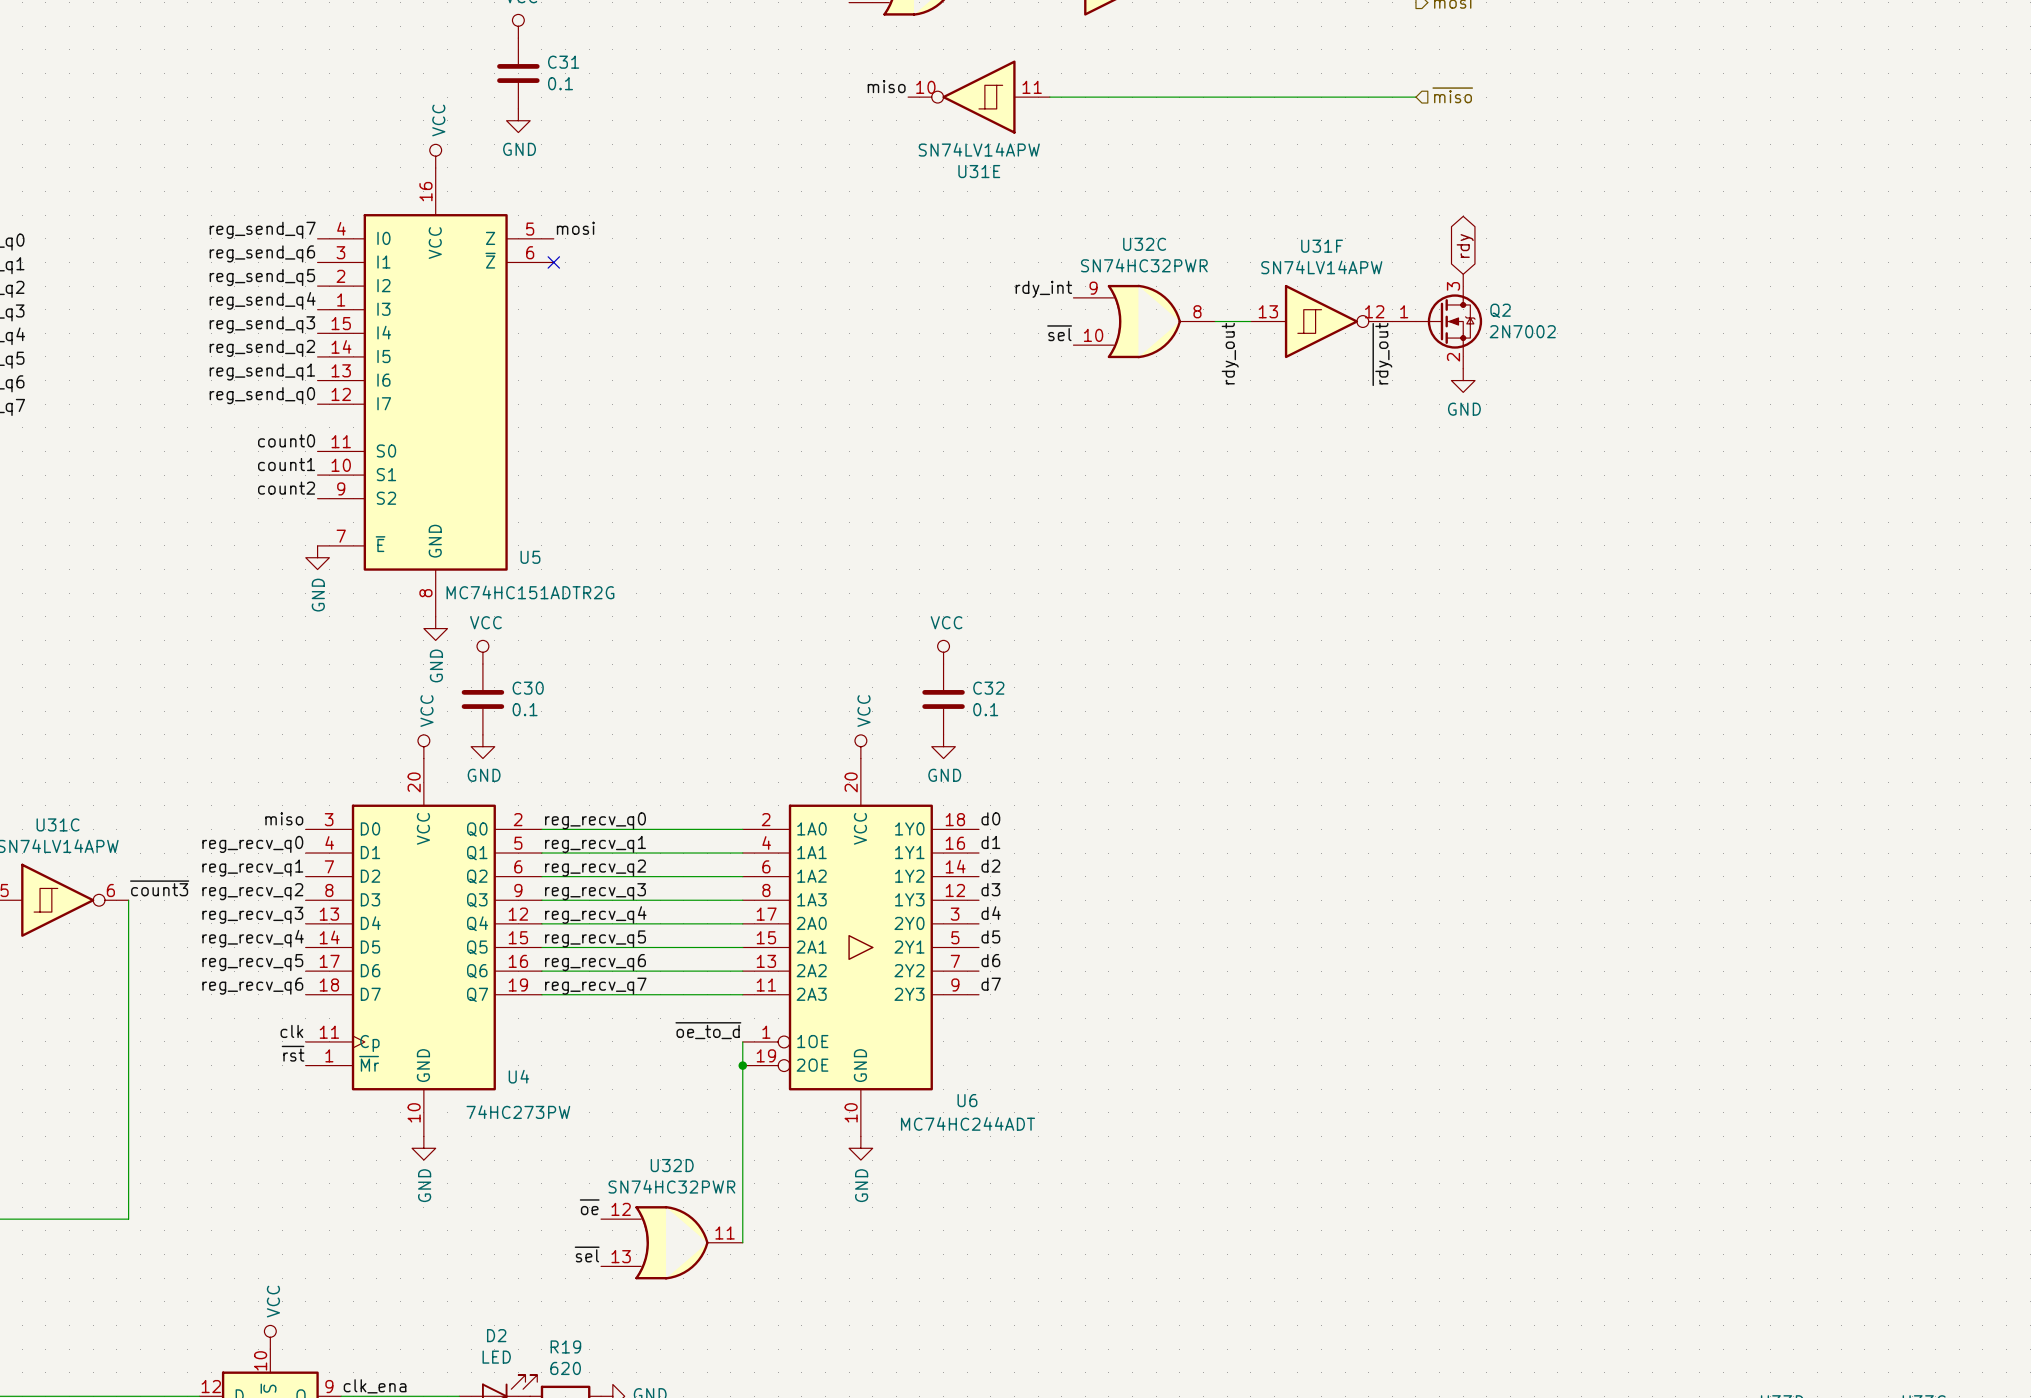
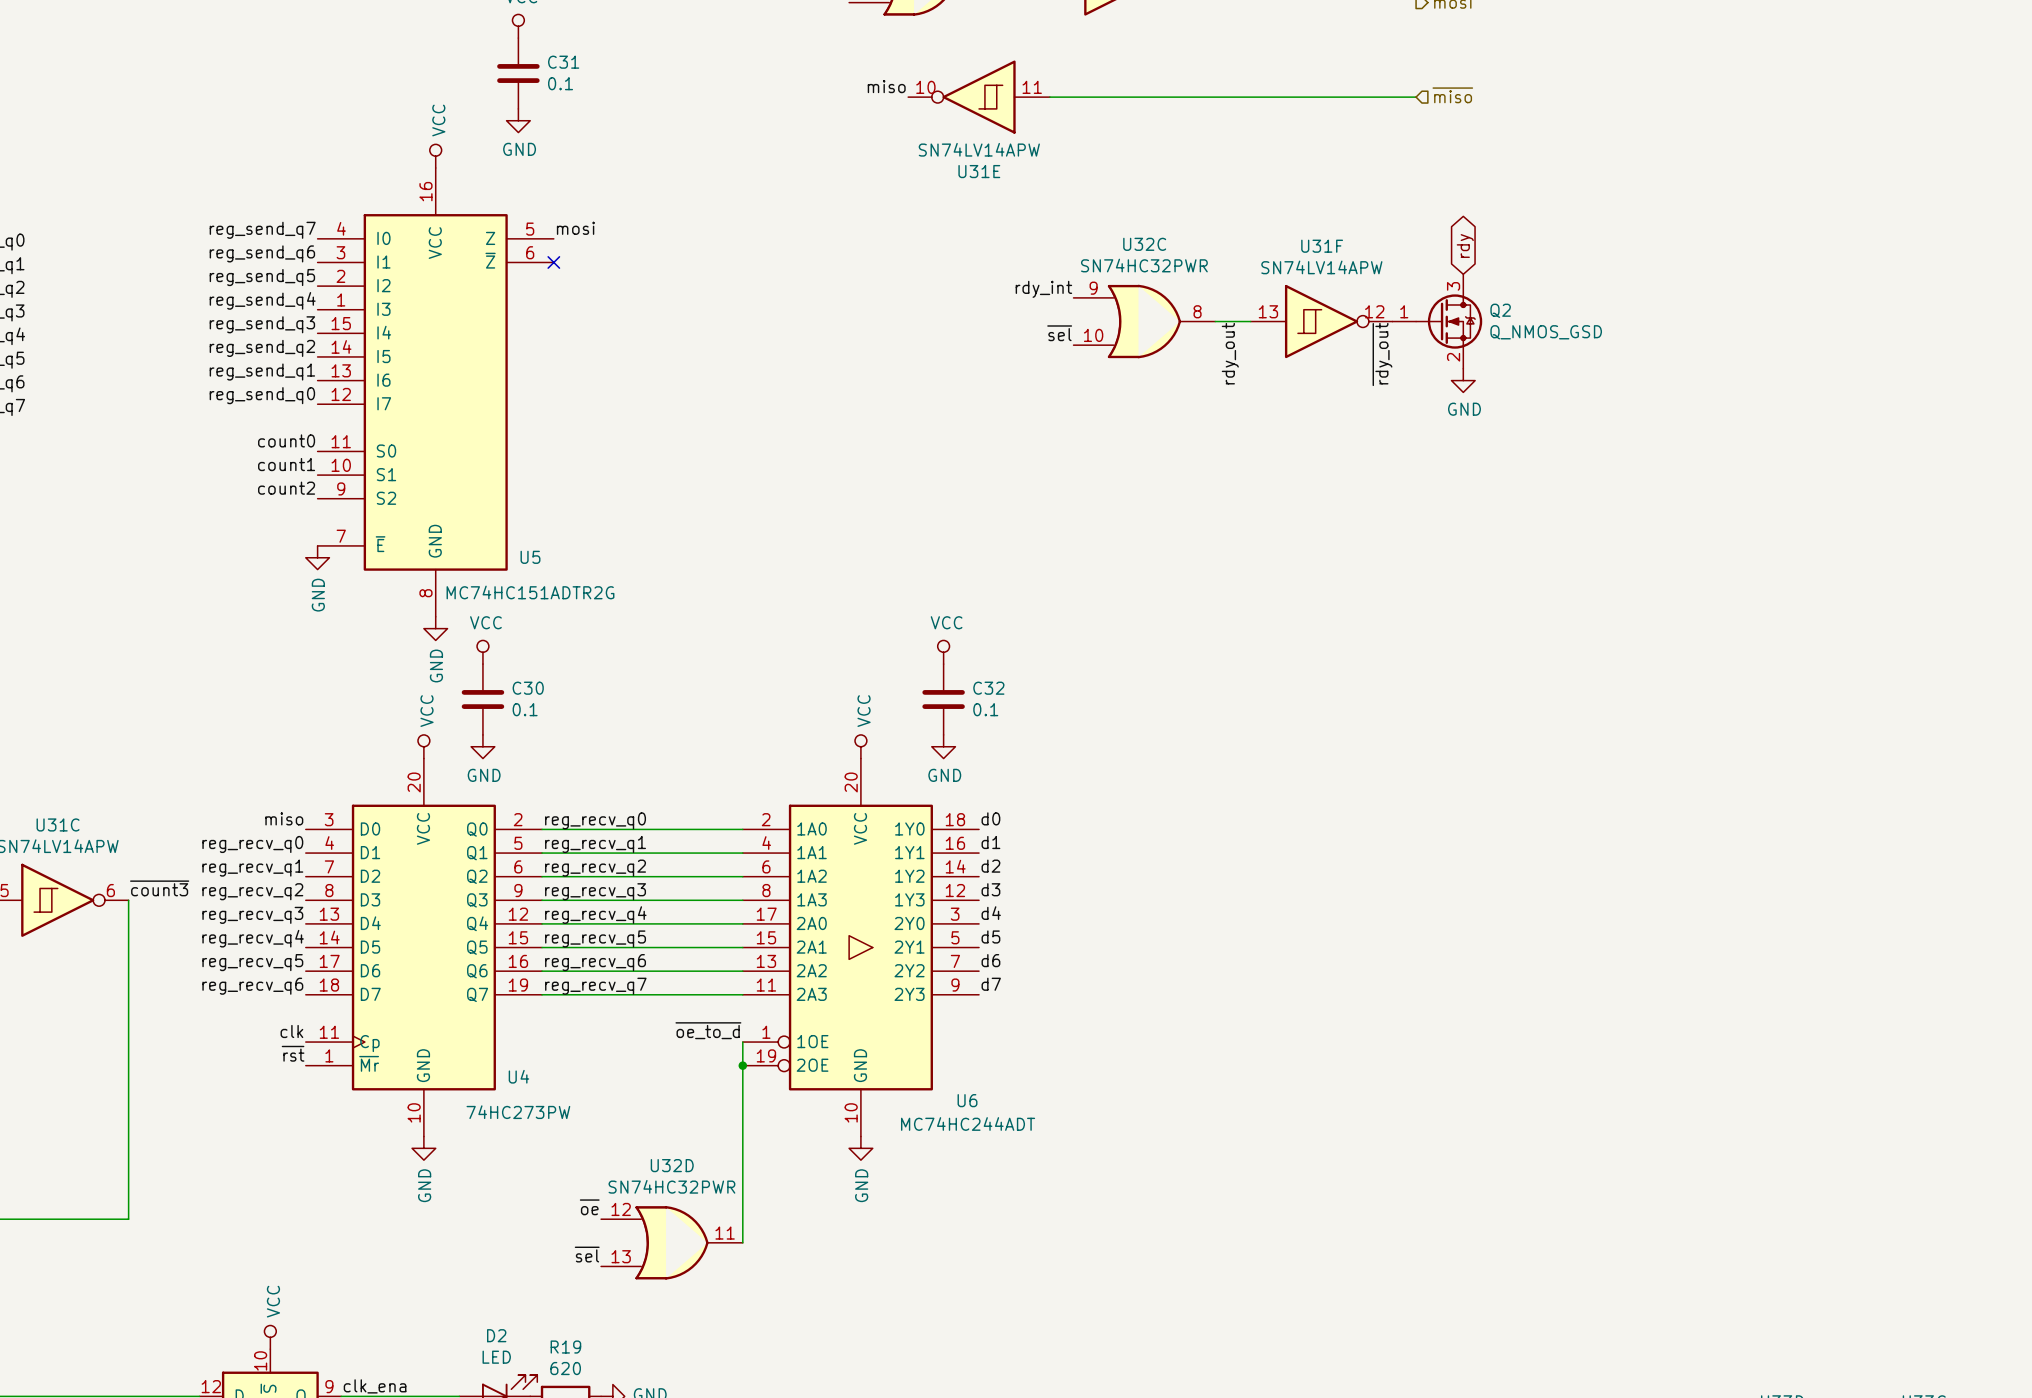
Q2 value: 2N7002 (1522, 331) -> Q_NMOS_GSD (1546, 332)

